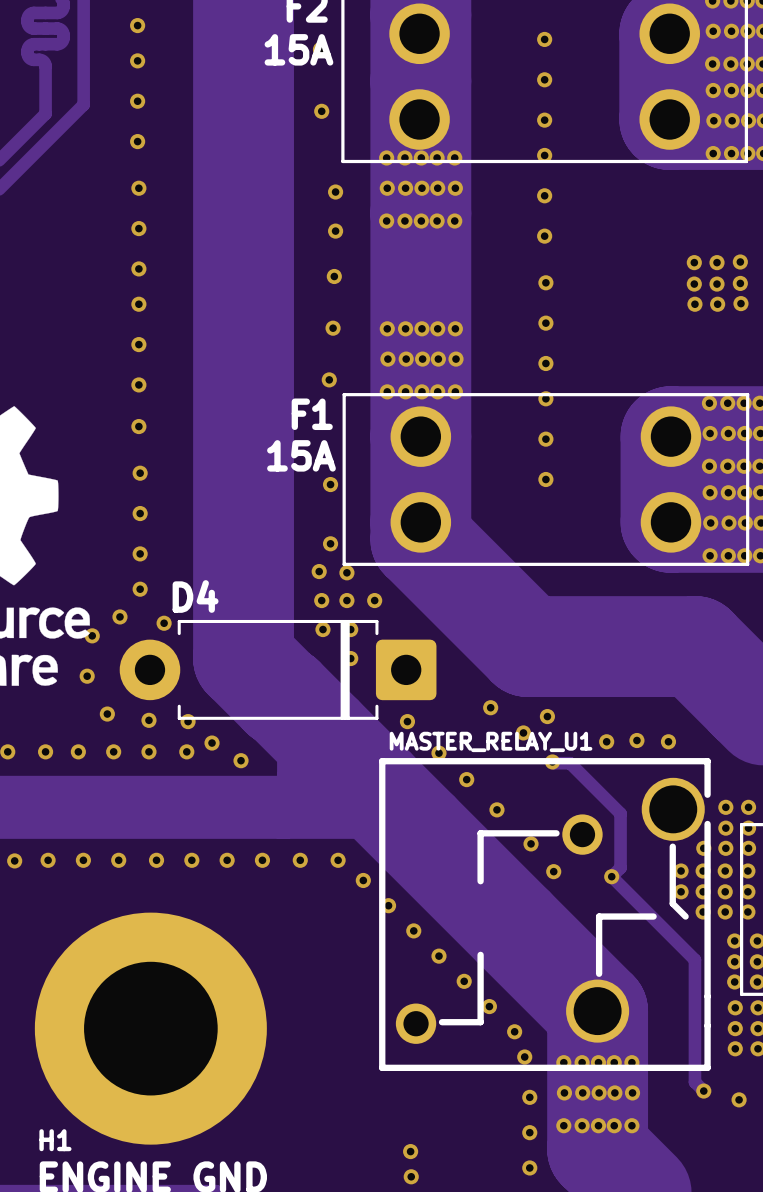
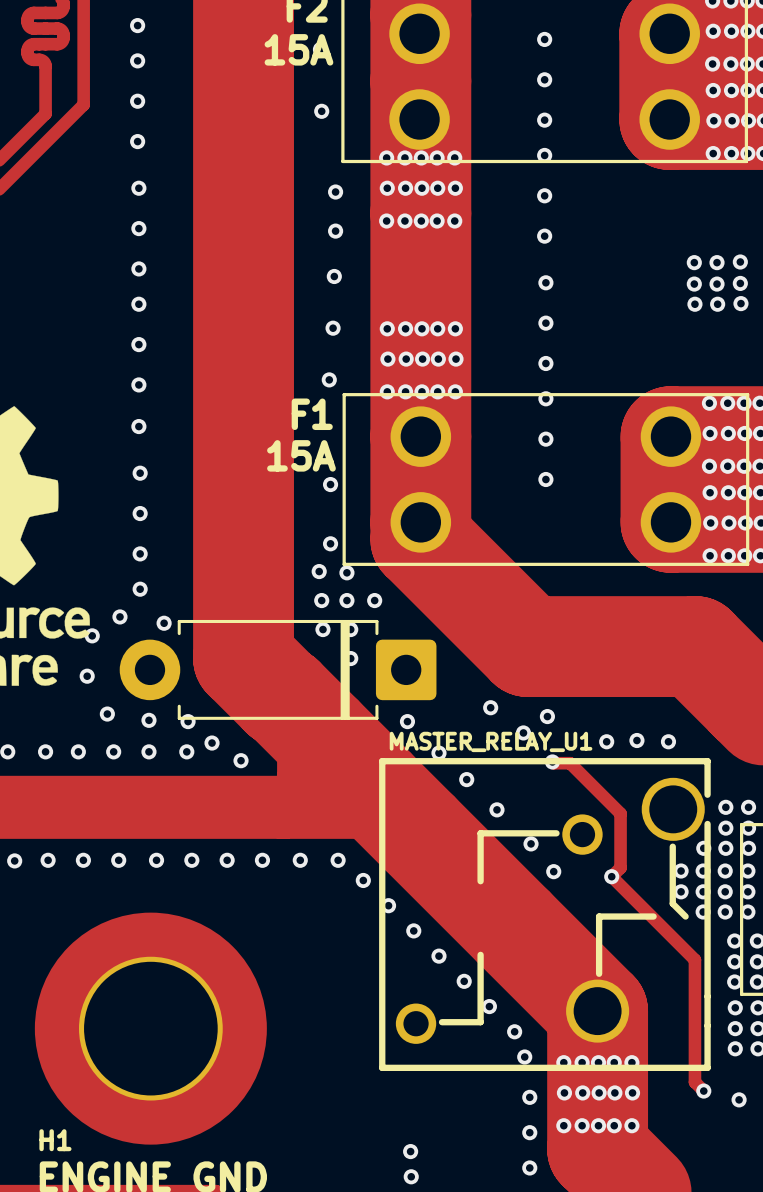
text: D4 (195, 596) -> none

